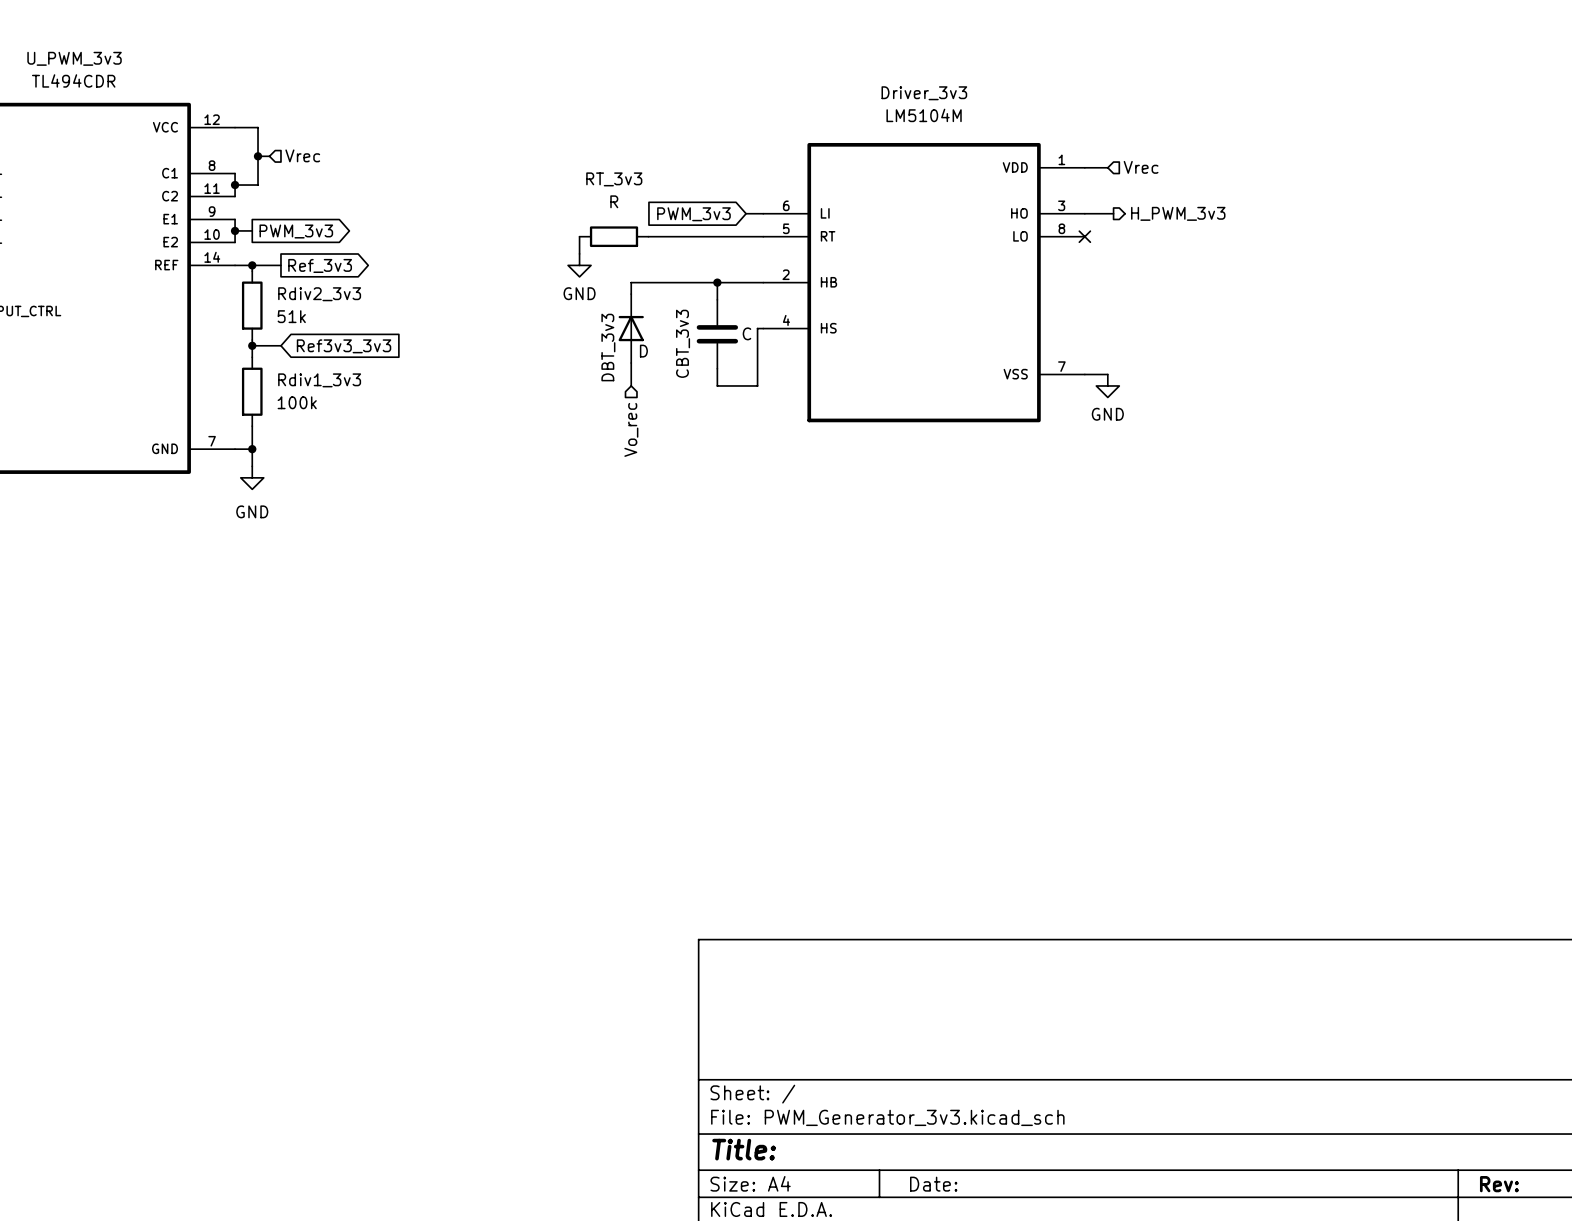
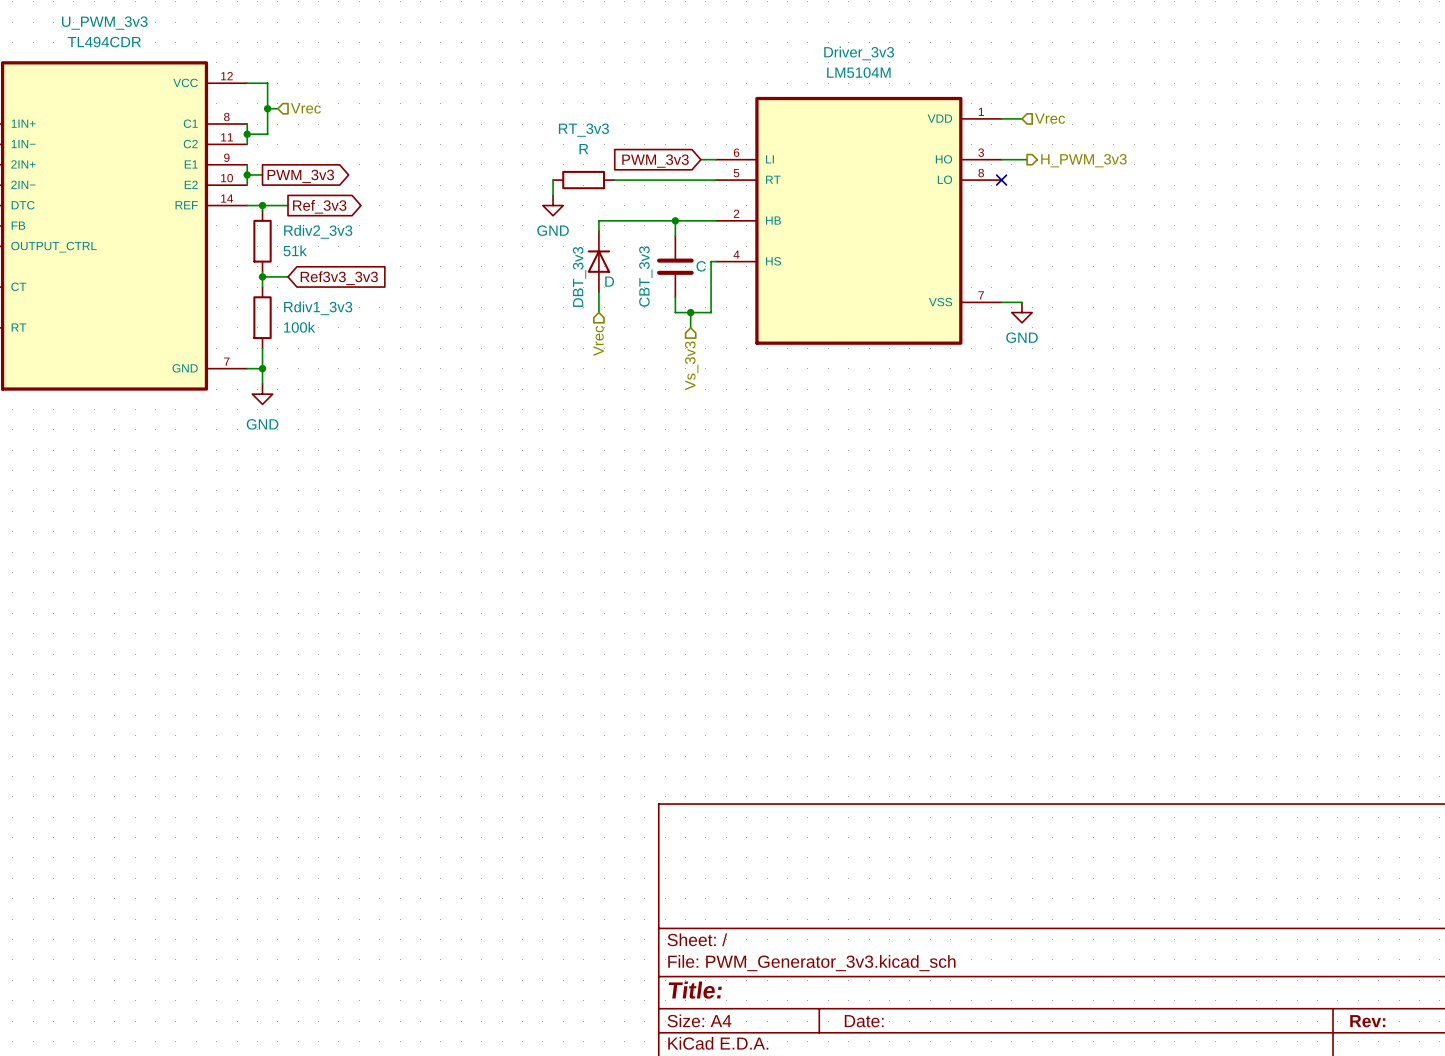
wire: none -> (690, 312) (690, 327)
junction: none -> (690, 312)
hierarchical label: Vo_rec (631, 429) -> Vrec (598, 340)
hierarchical label: none -> Vs_3v3 (691, 365)

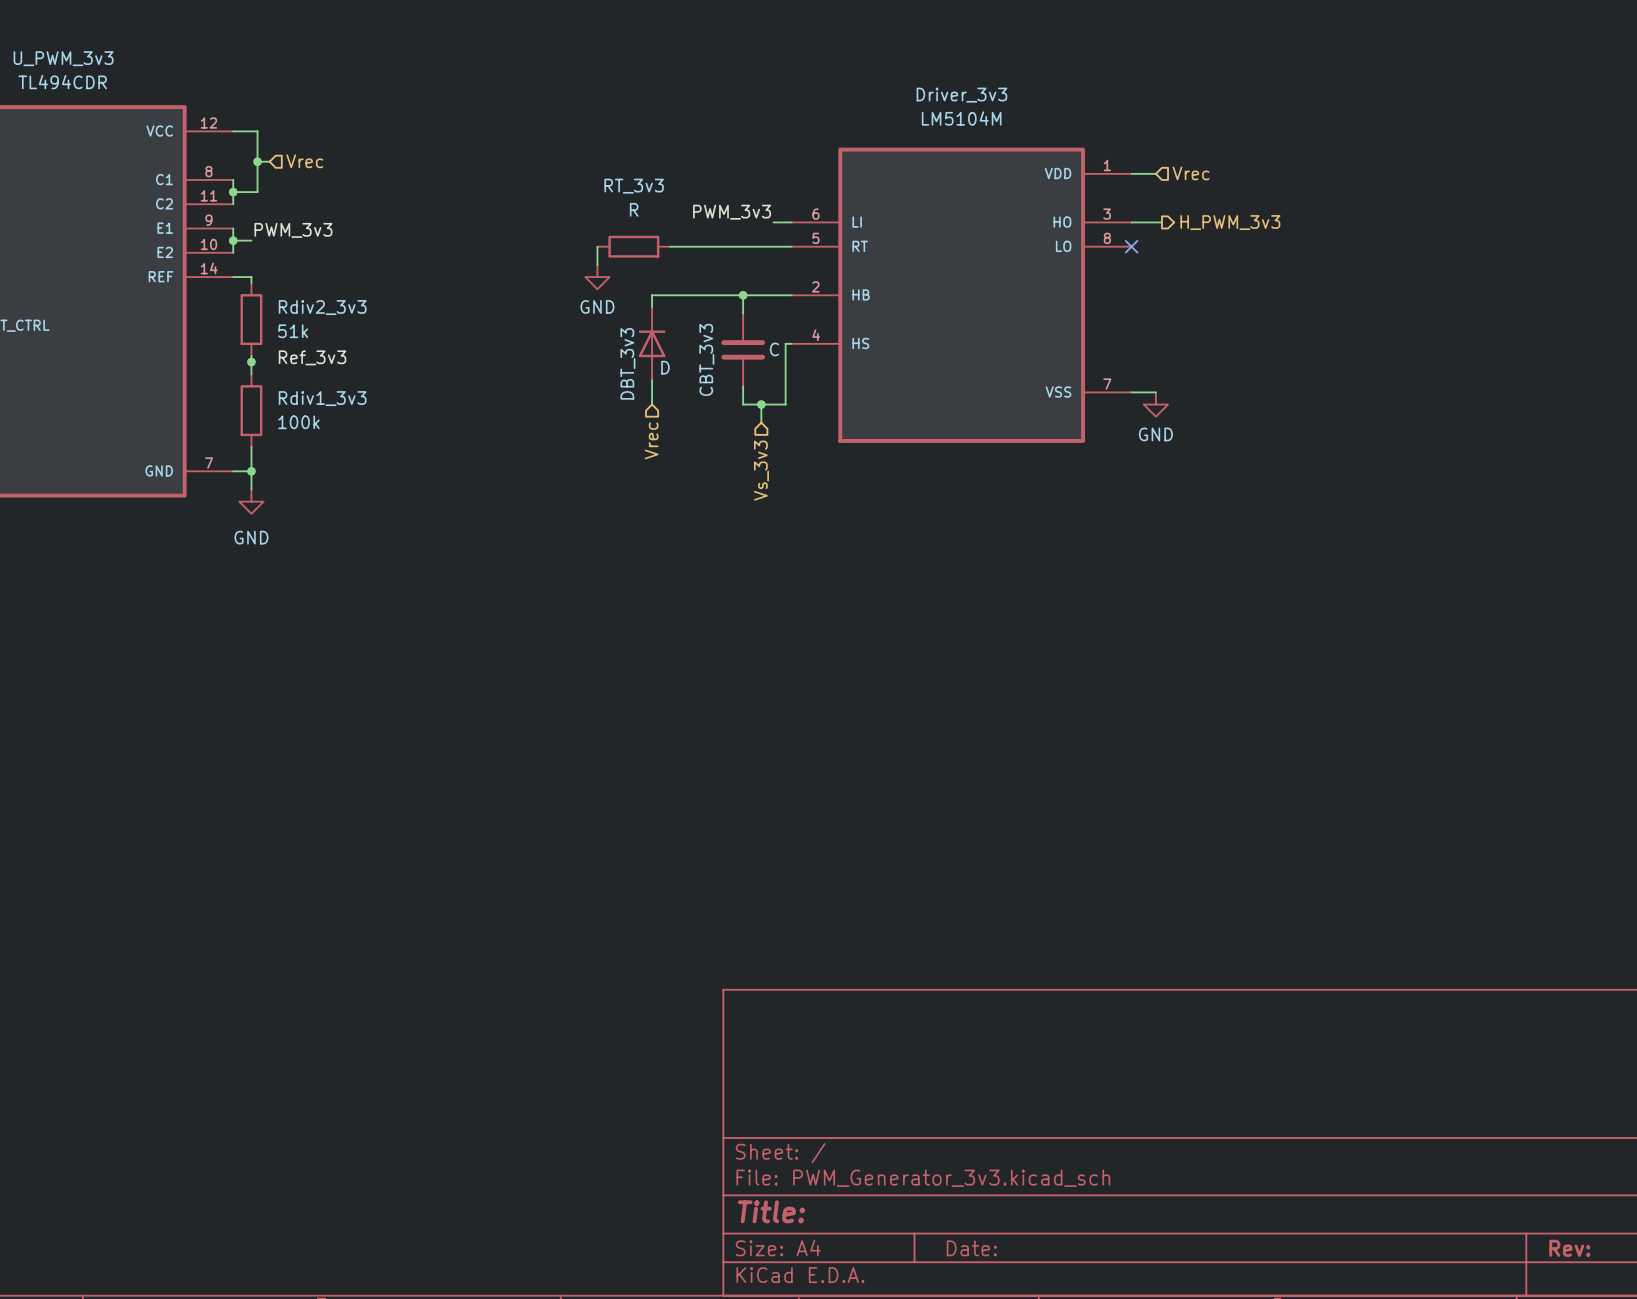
label: none -> PWM_3v3 (732, 212)
global label: PWM_3v3 (655, 161) -> none
label: none -> PWM_3v3 (293, 230)
global label: PWM_3v3 (300, 176) -> none
wire: (262, 205) (288, 205) -> none
junction: (262, 205) -> none
global label: Ref_3v3 (319, 206) -> none
label: none -> Ref_3v3 (312, 357)
wire: (262, 276) (288, 276) -> none
global label: Ref3v3_3v3 (339, 278) -> none

